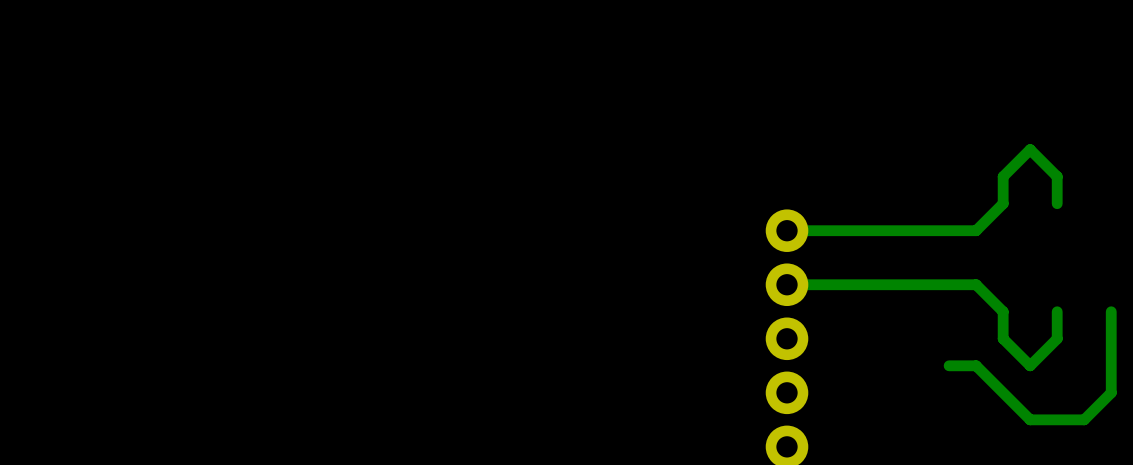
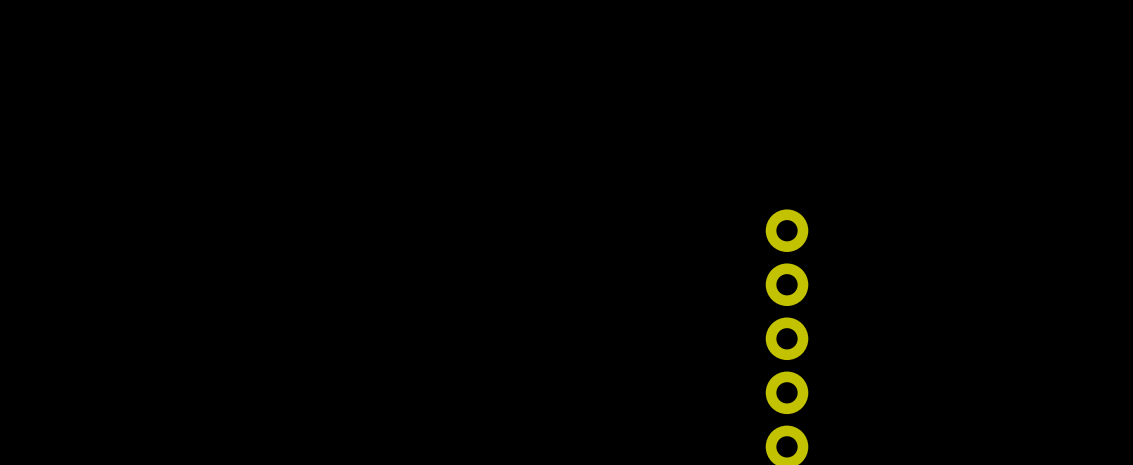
track: (1057, 203) (1057, 176) (1030, 149) (1003, 176) (1003, 203) (976, 230) (787, 230) -> none
track: (787, 284) (976, 284) (1003, 311) (1003, 338) (1030, 365) (1057, 338) (1057, 311) -> none
track: (1111, 311) (1111, 392) (1084, 419) (1030, 419) (976, 365) (949, 365) -> none

